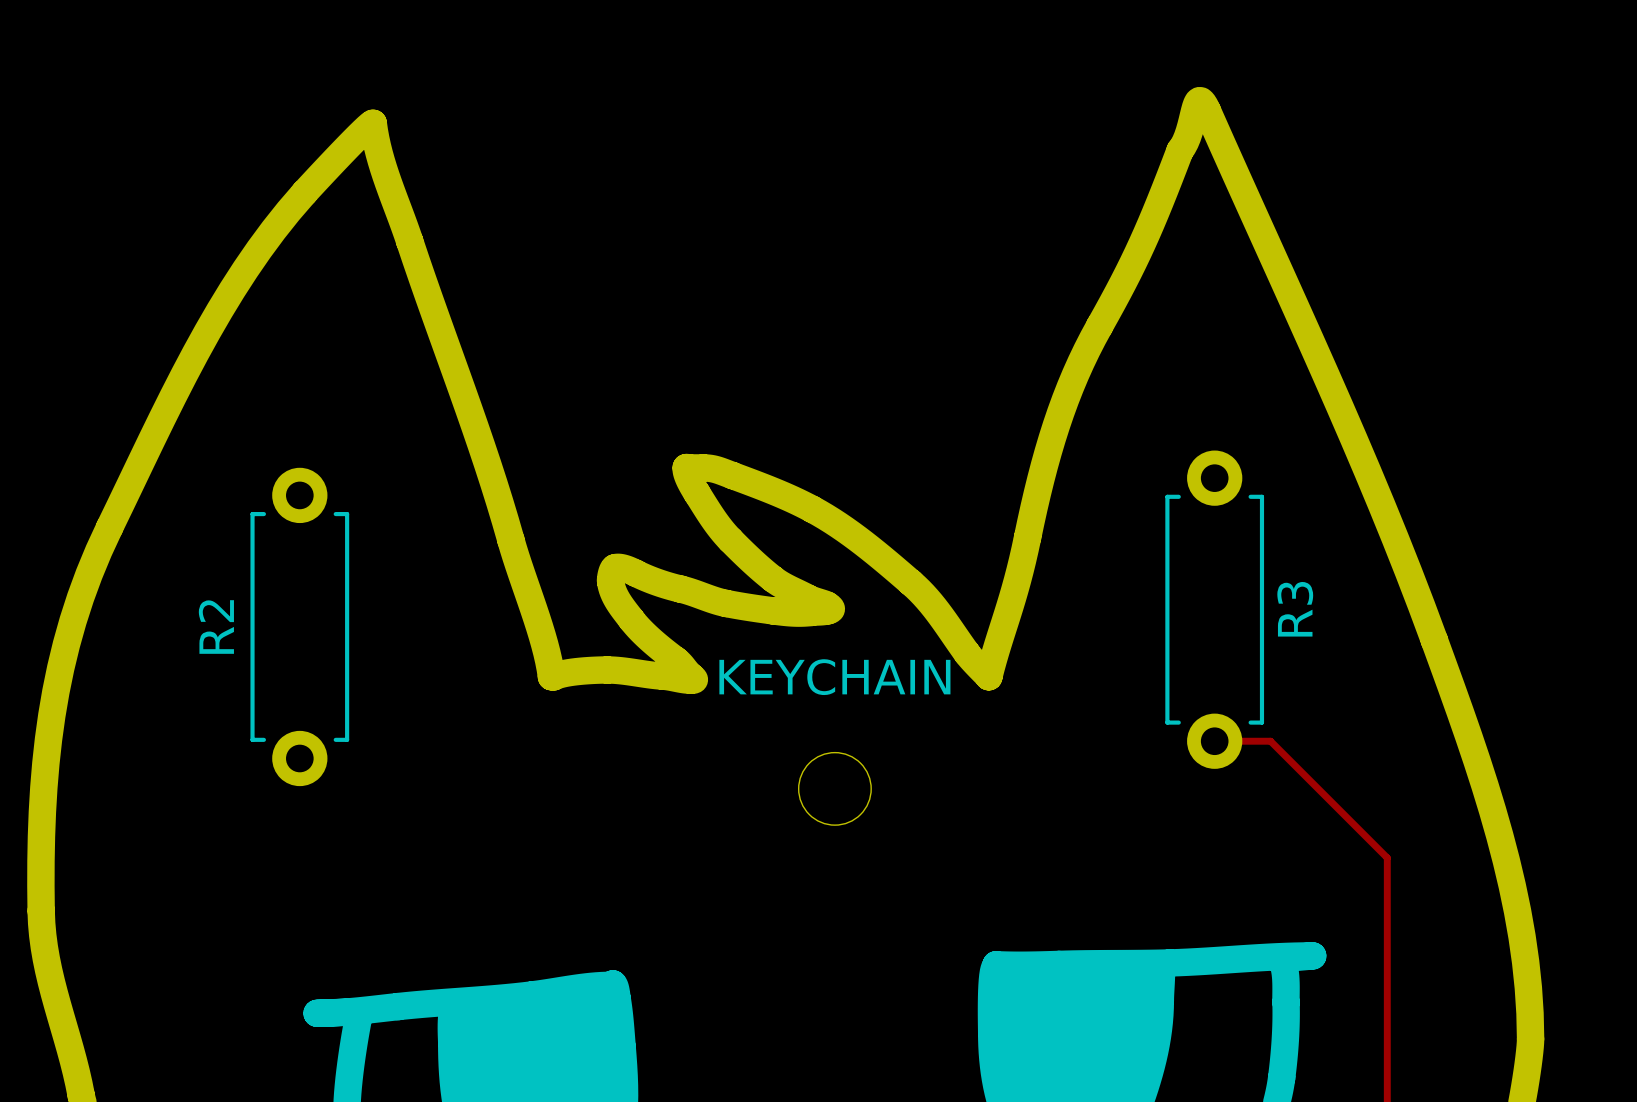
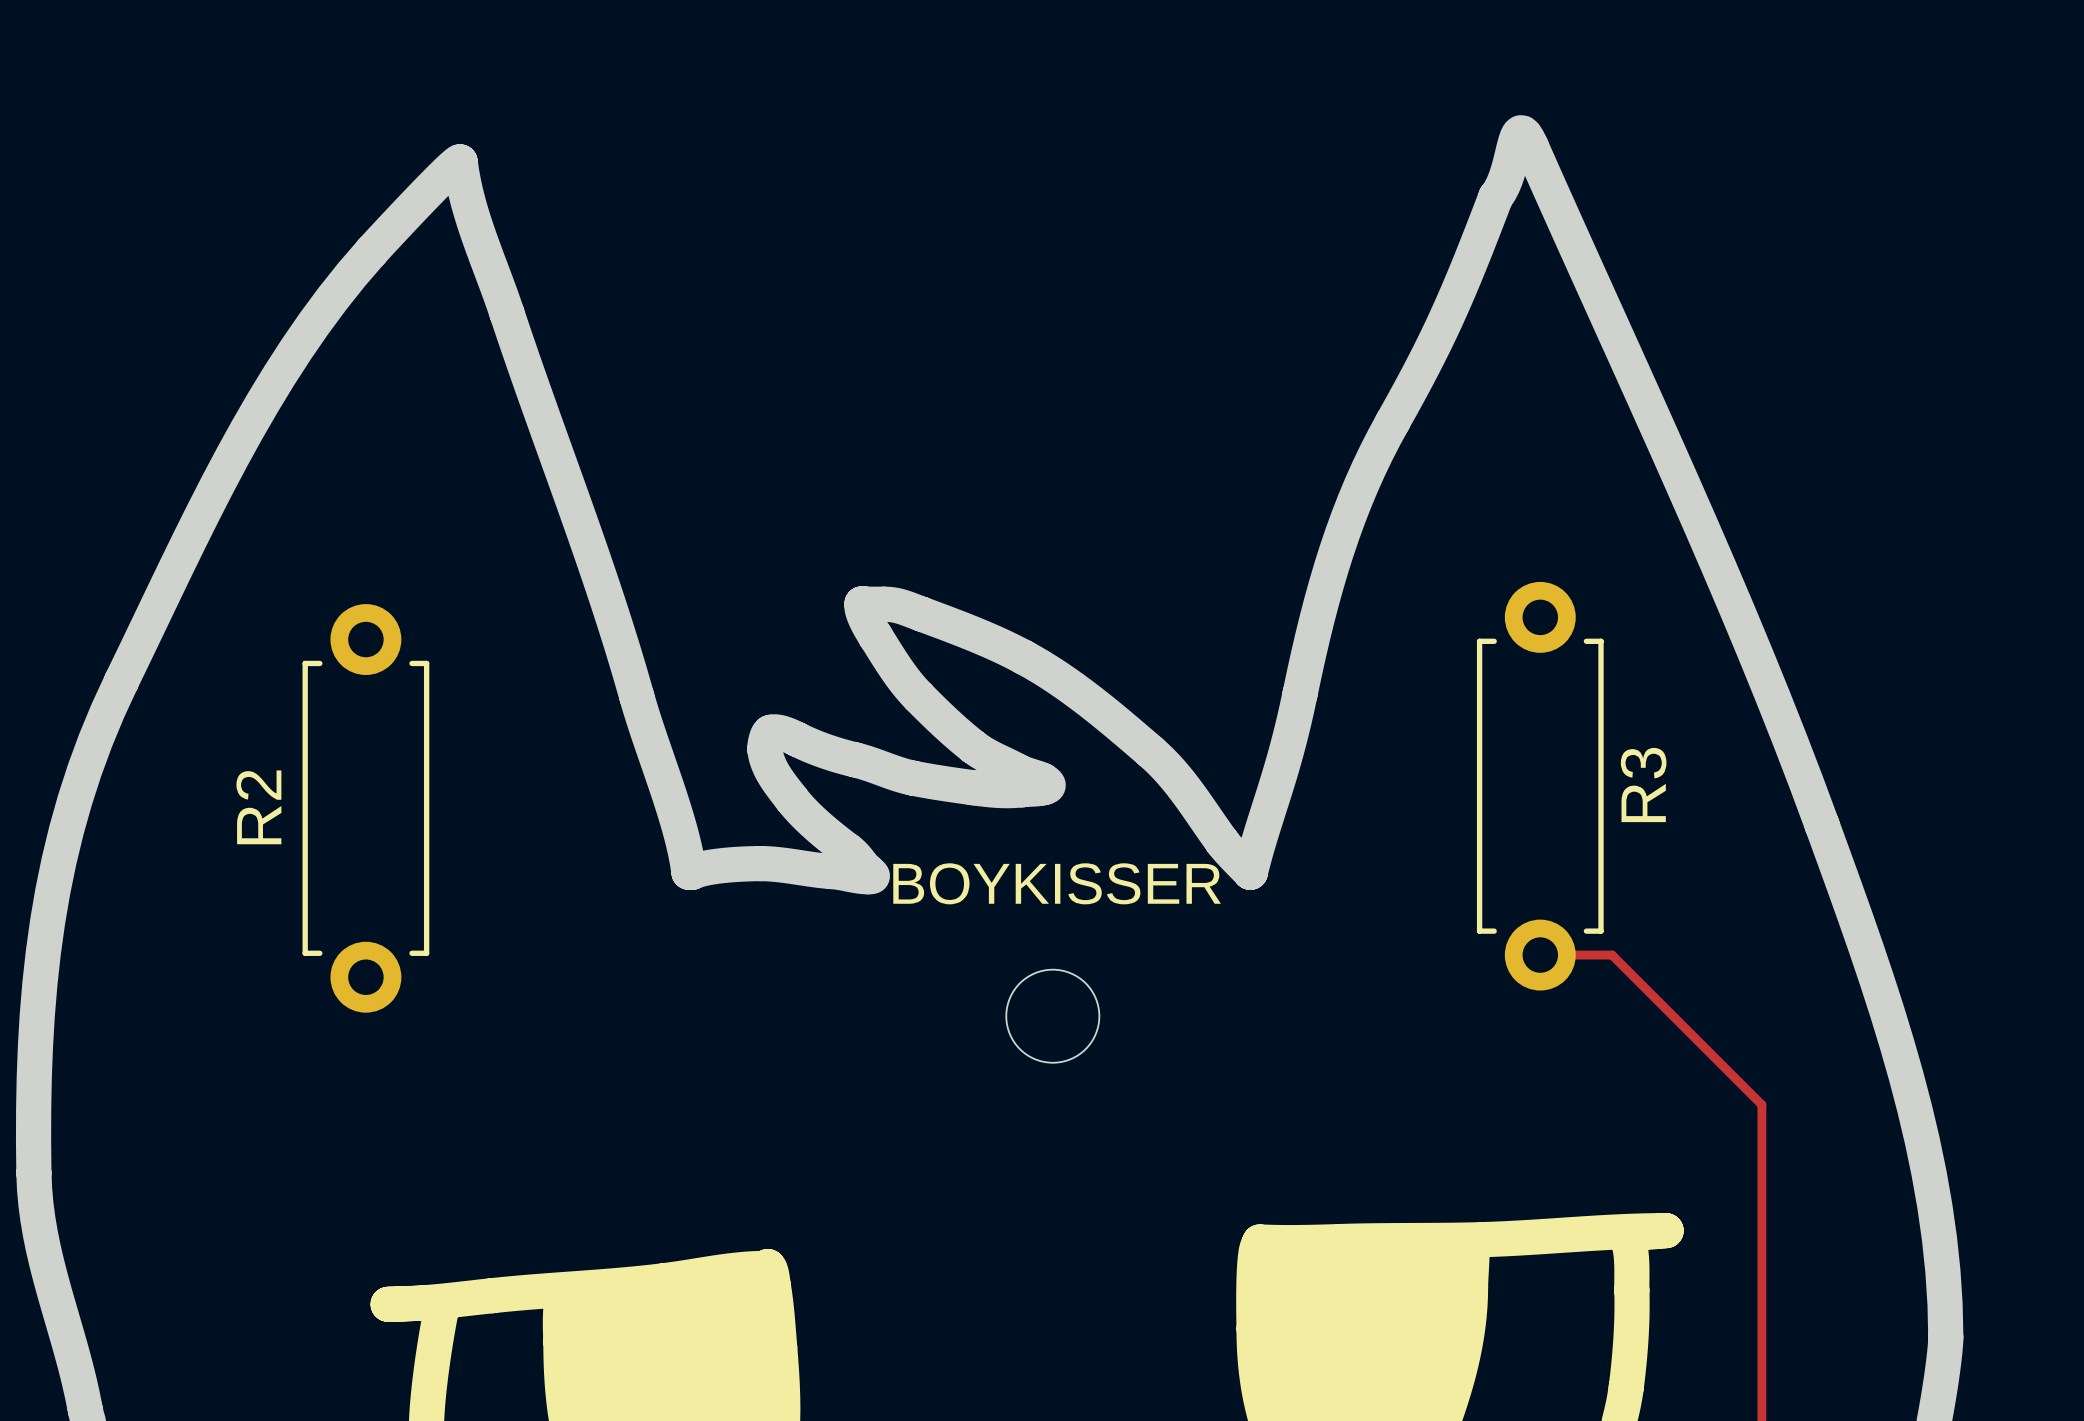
KEYCHAIN name: KEYCHAIN (834, 677) -> BOYKISSER (1057, 883)

